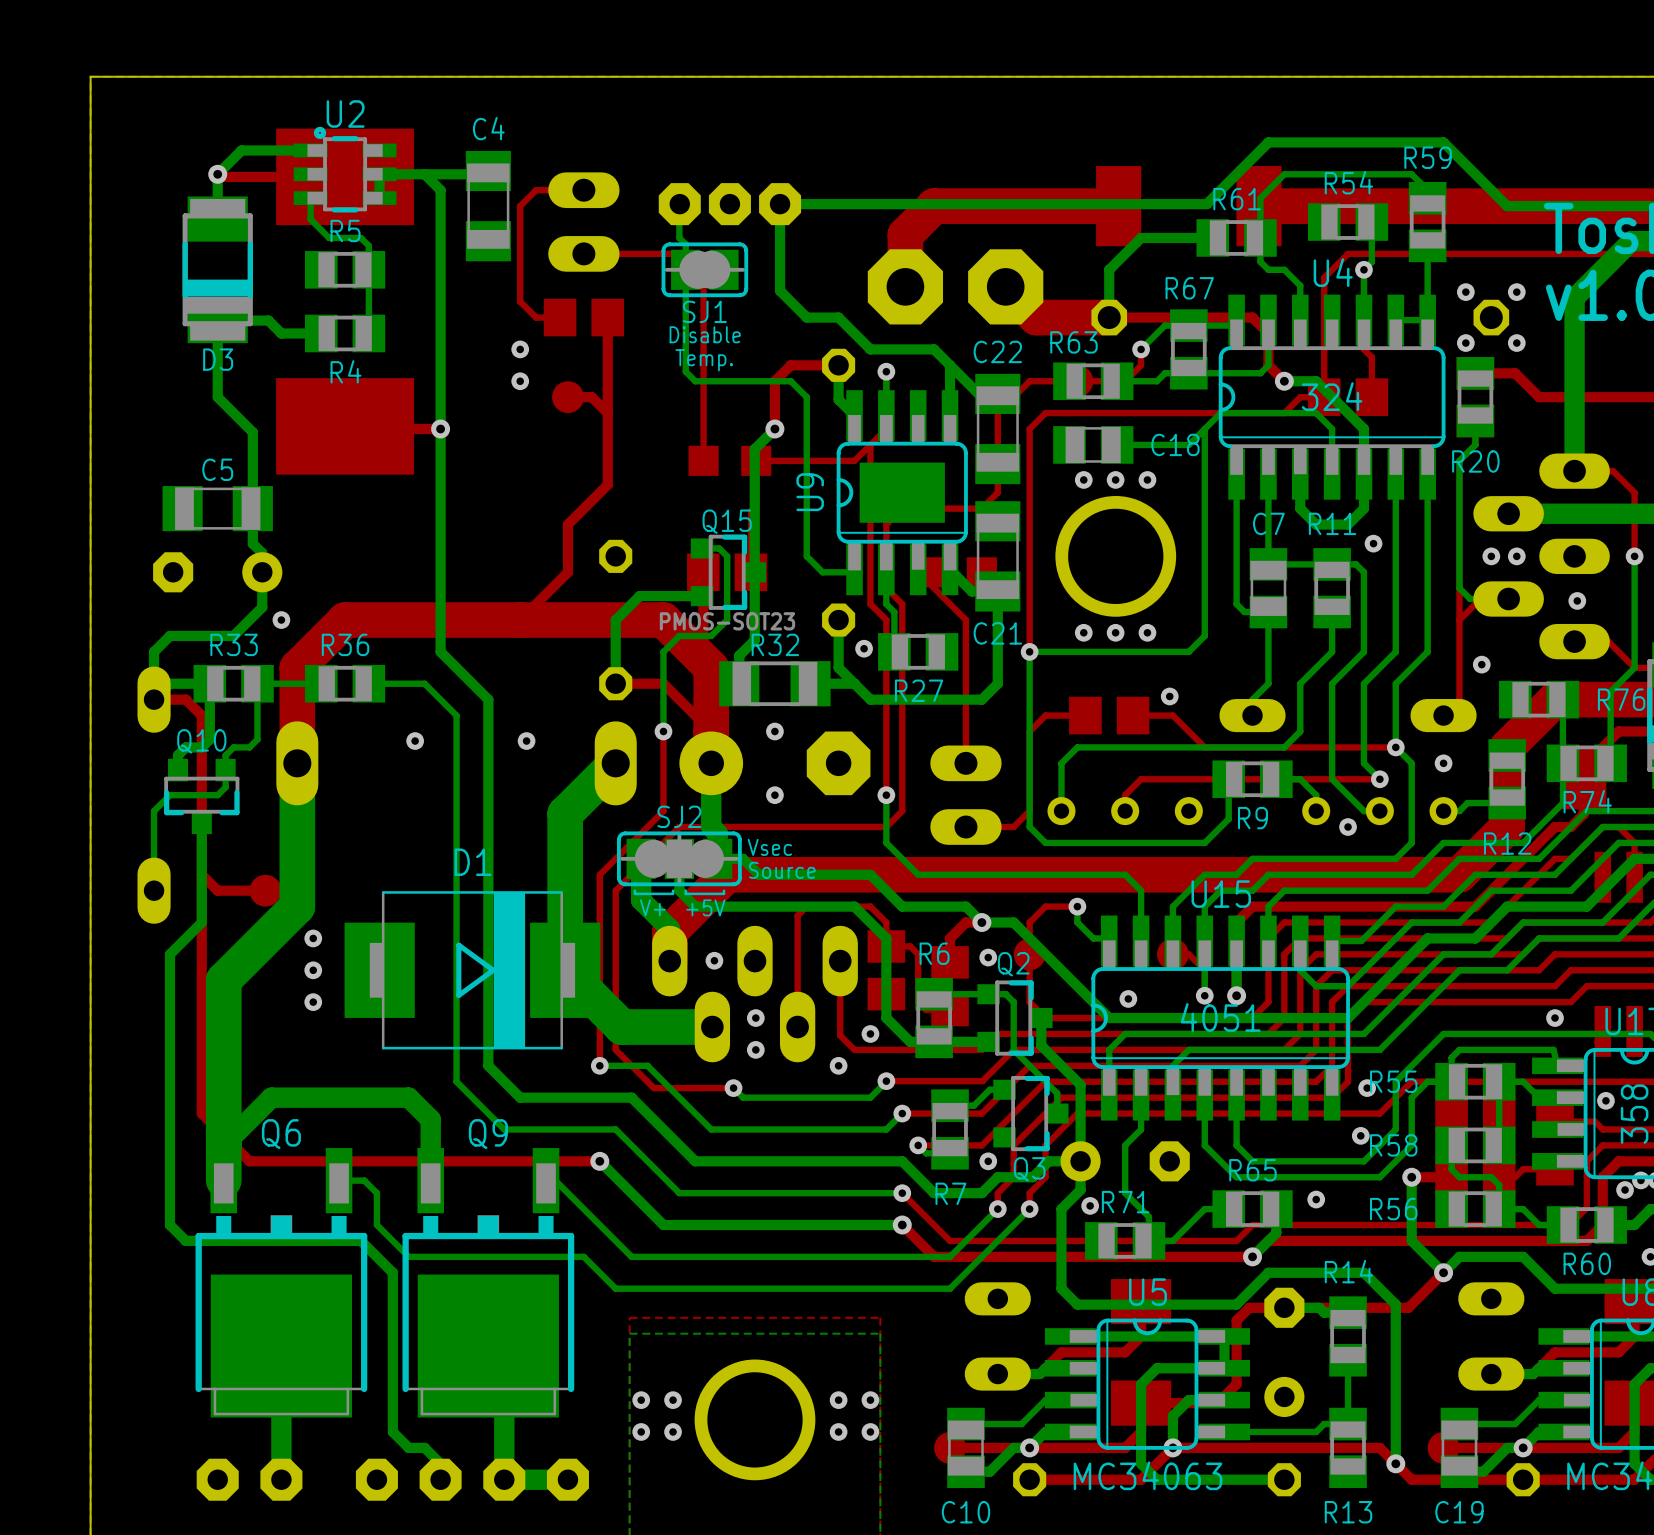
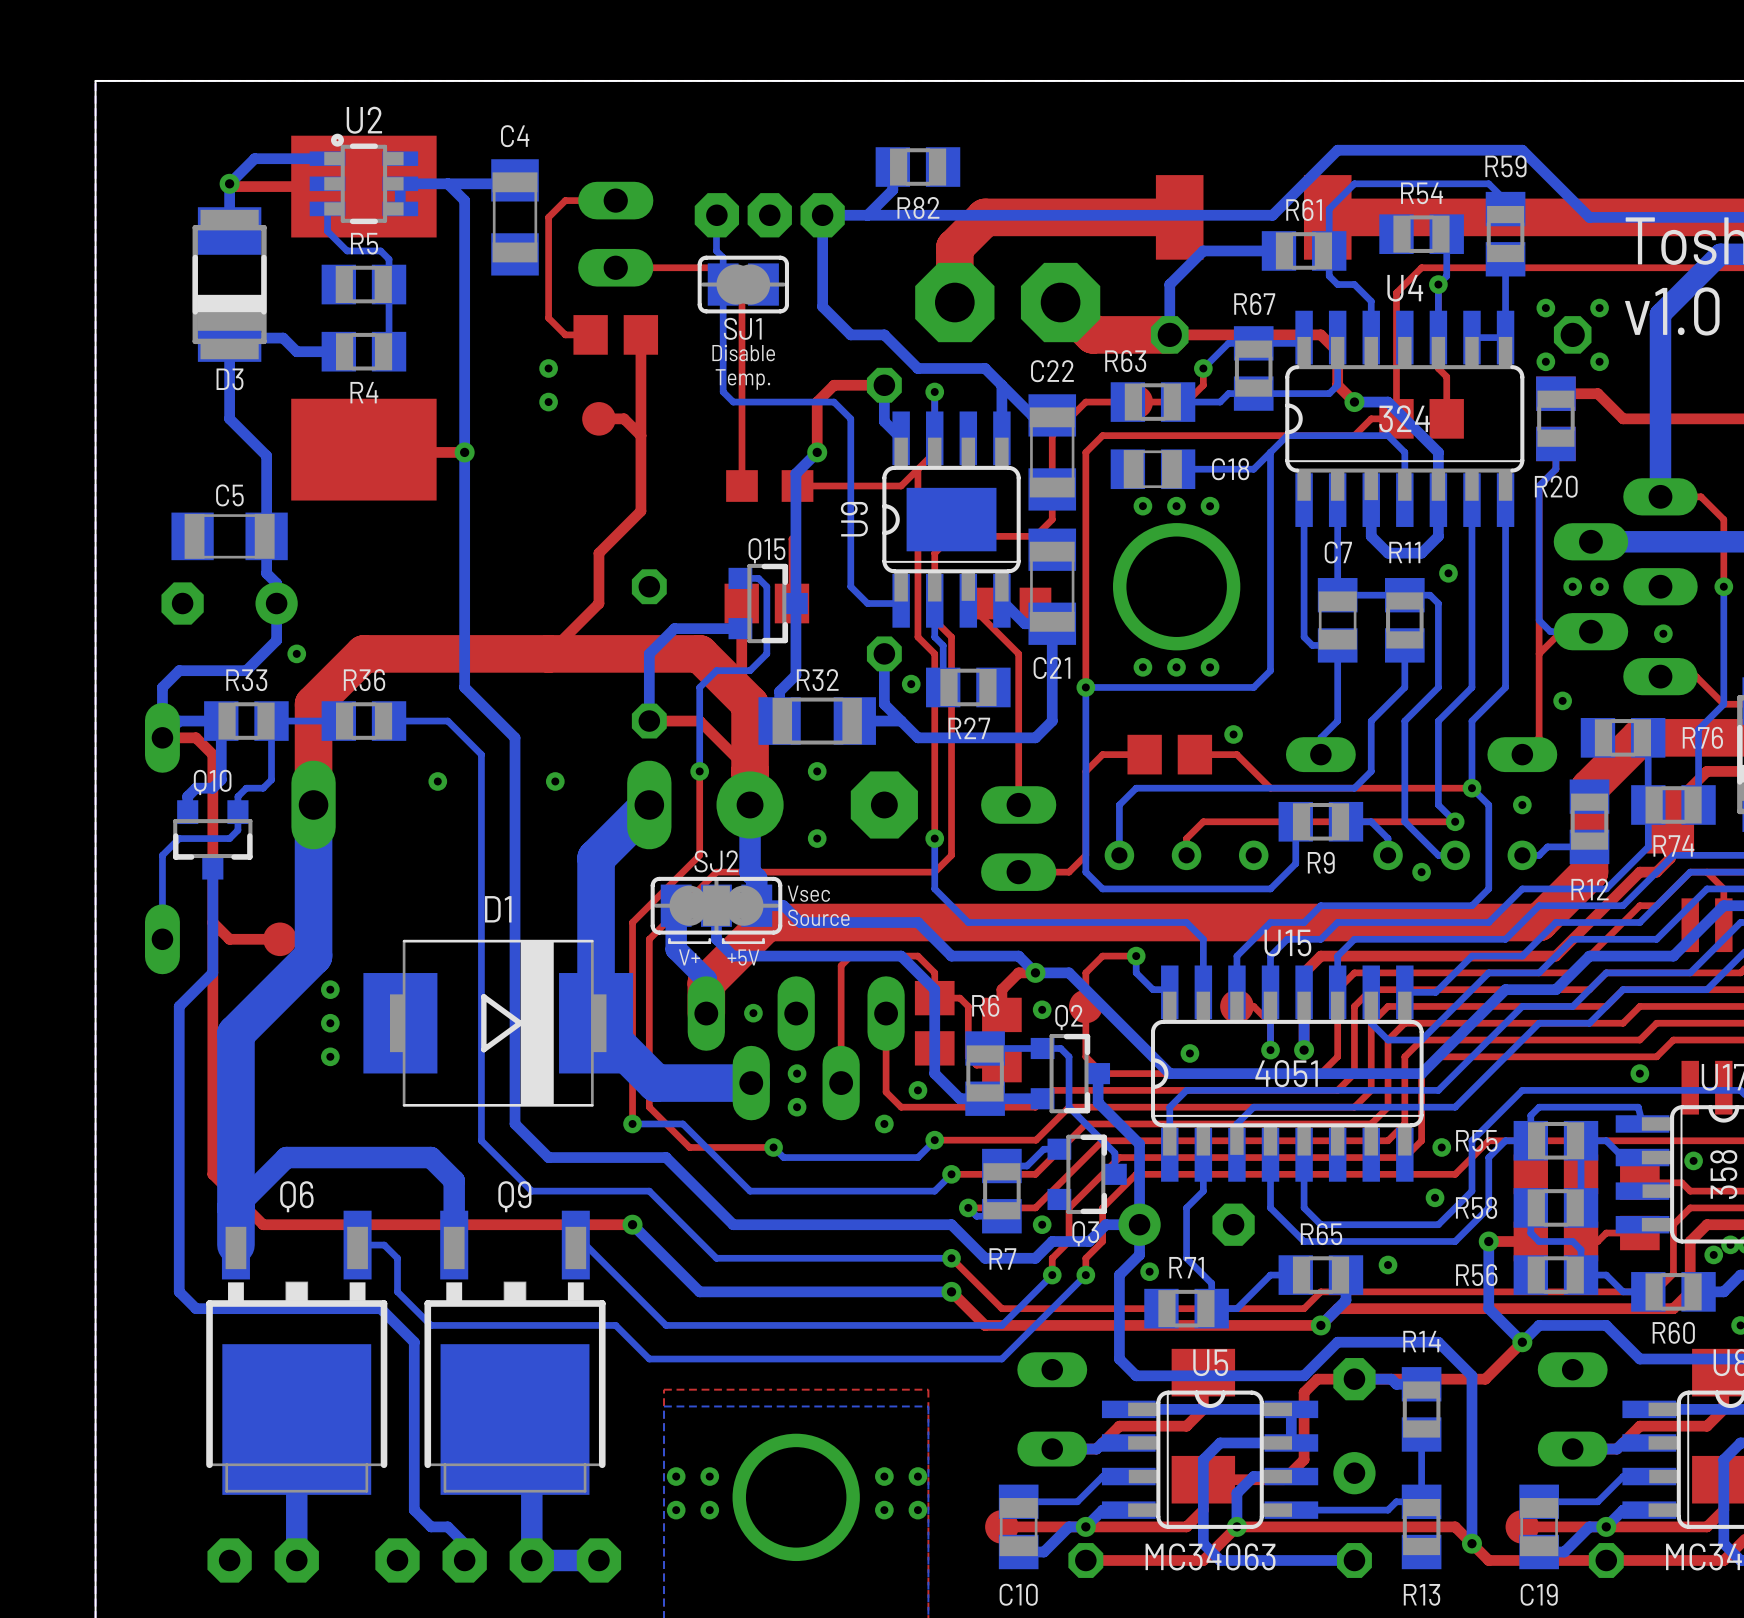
bottom track: none -> (892, 167) (892, 190) (867, 215)
R82: none -> (917, 167)
Q15 value: PMOS-SOT23 (727, 621) -> none

